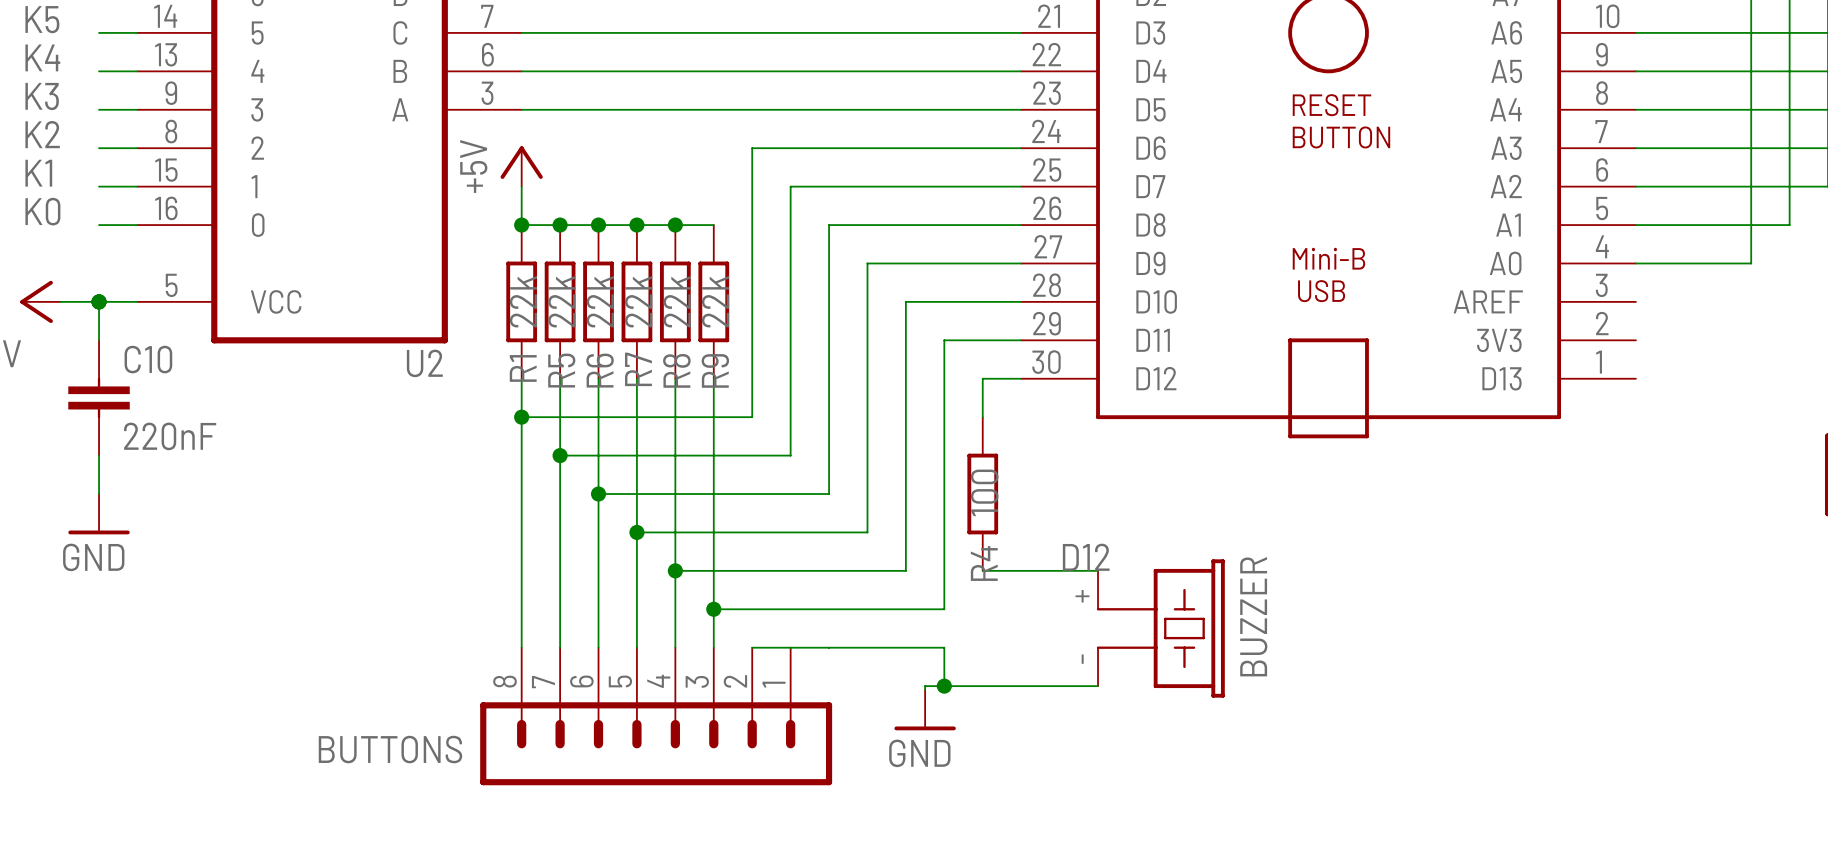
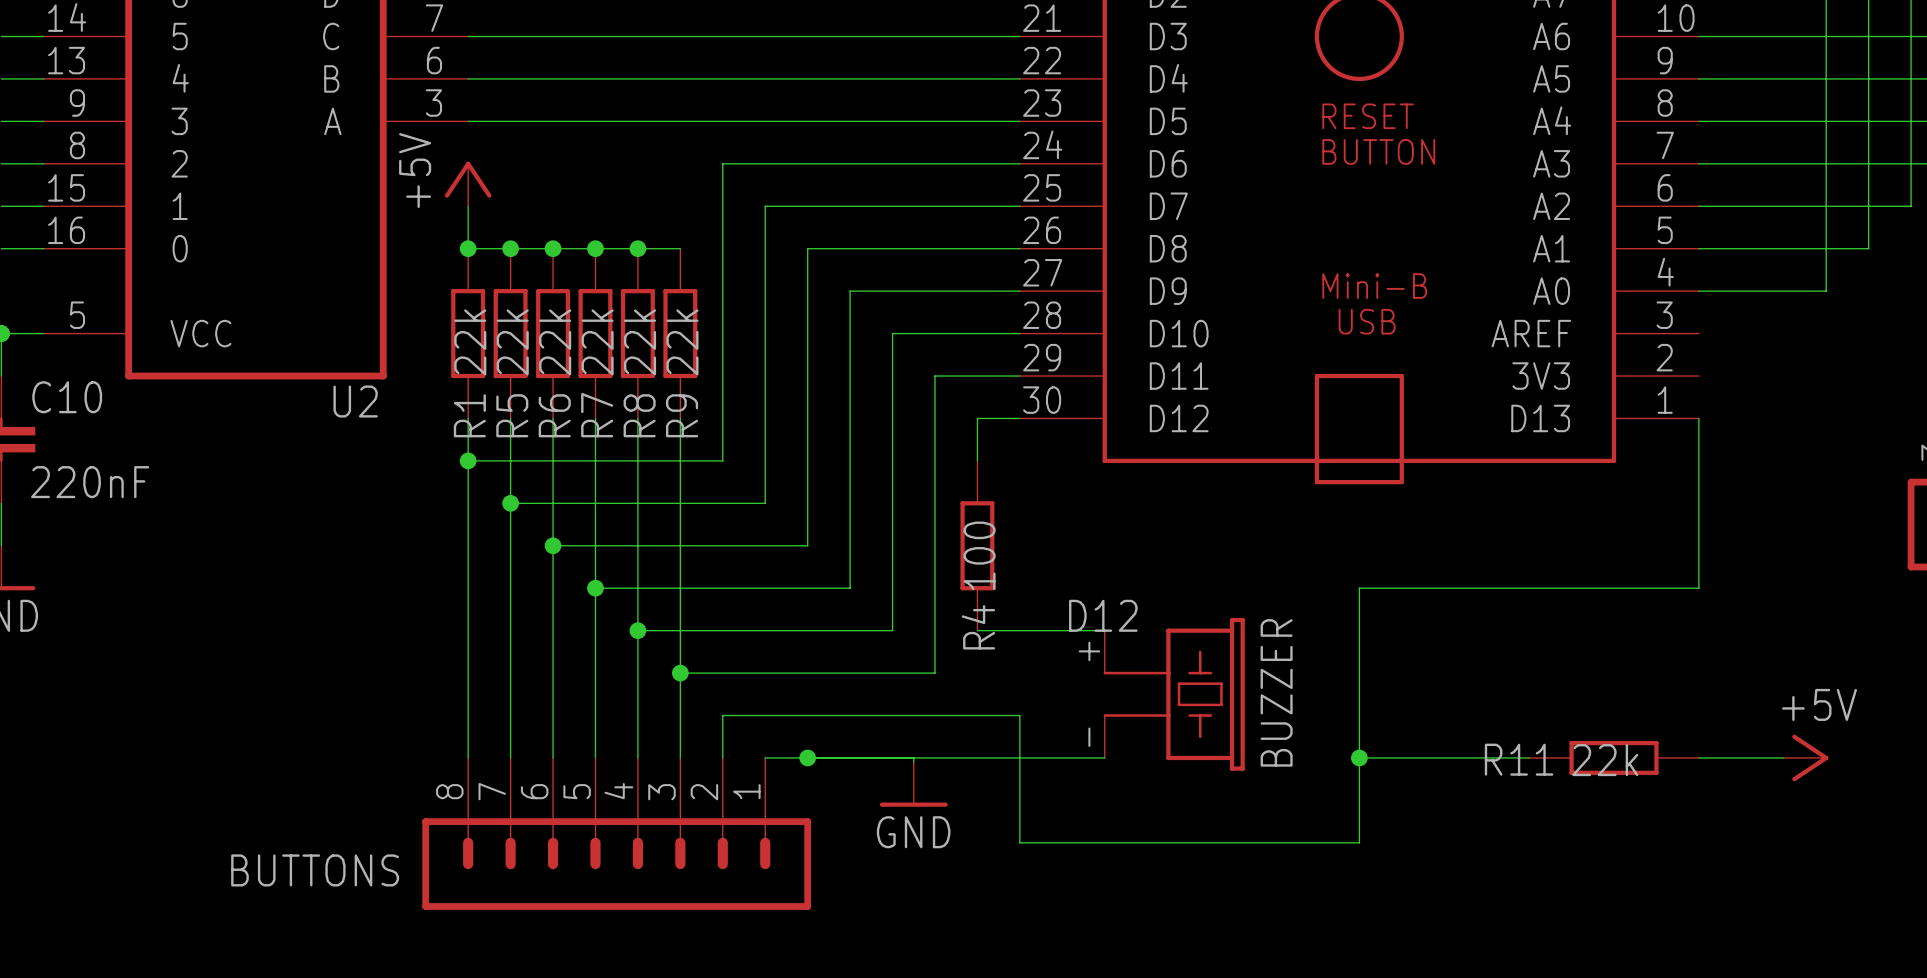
wire: (944, 647) (944, 686) -> (934, 715) (1019, 715) (1019, 842) (1359, 842) (1359, 588) (1698, 588) (1698, 418)
wire: none -> (765, 757) (913, 757)
junction: none -> (807, 757)
junction: (944, 686) -> none
wire: none -> (1359, 757) (1529, 757)
junction: none -> (1359, 757)
R11: none -> 22k (1614, 757)
wire: none -> (1698, 757) (1783, 757)
power symbol: none -> +5V (1806, 757)
BUTTONS position: (656, 716) -> (616, 833)

